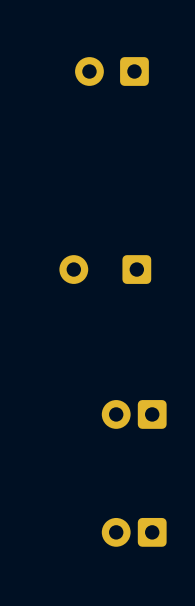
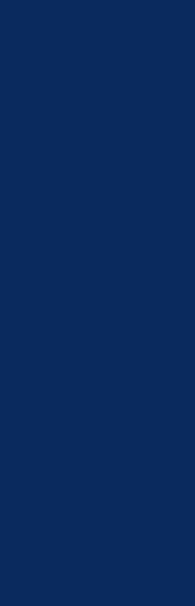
part: (111, 71) -> none
part: (105, 269) -> none
part: (134, 414) -> none
part: (134, 532) -> none

